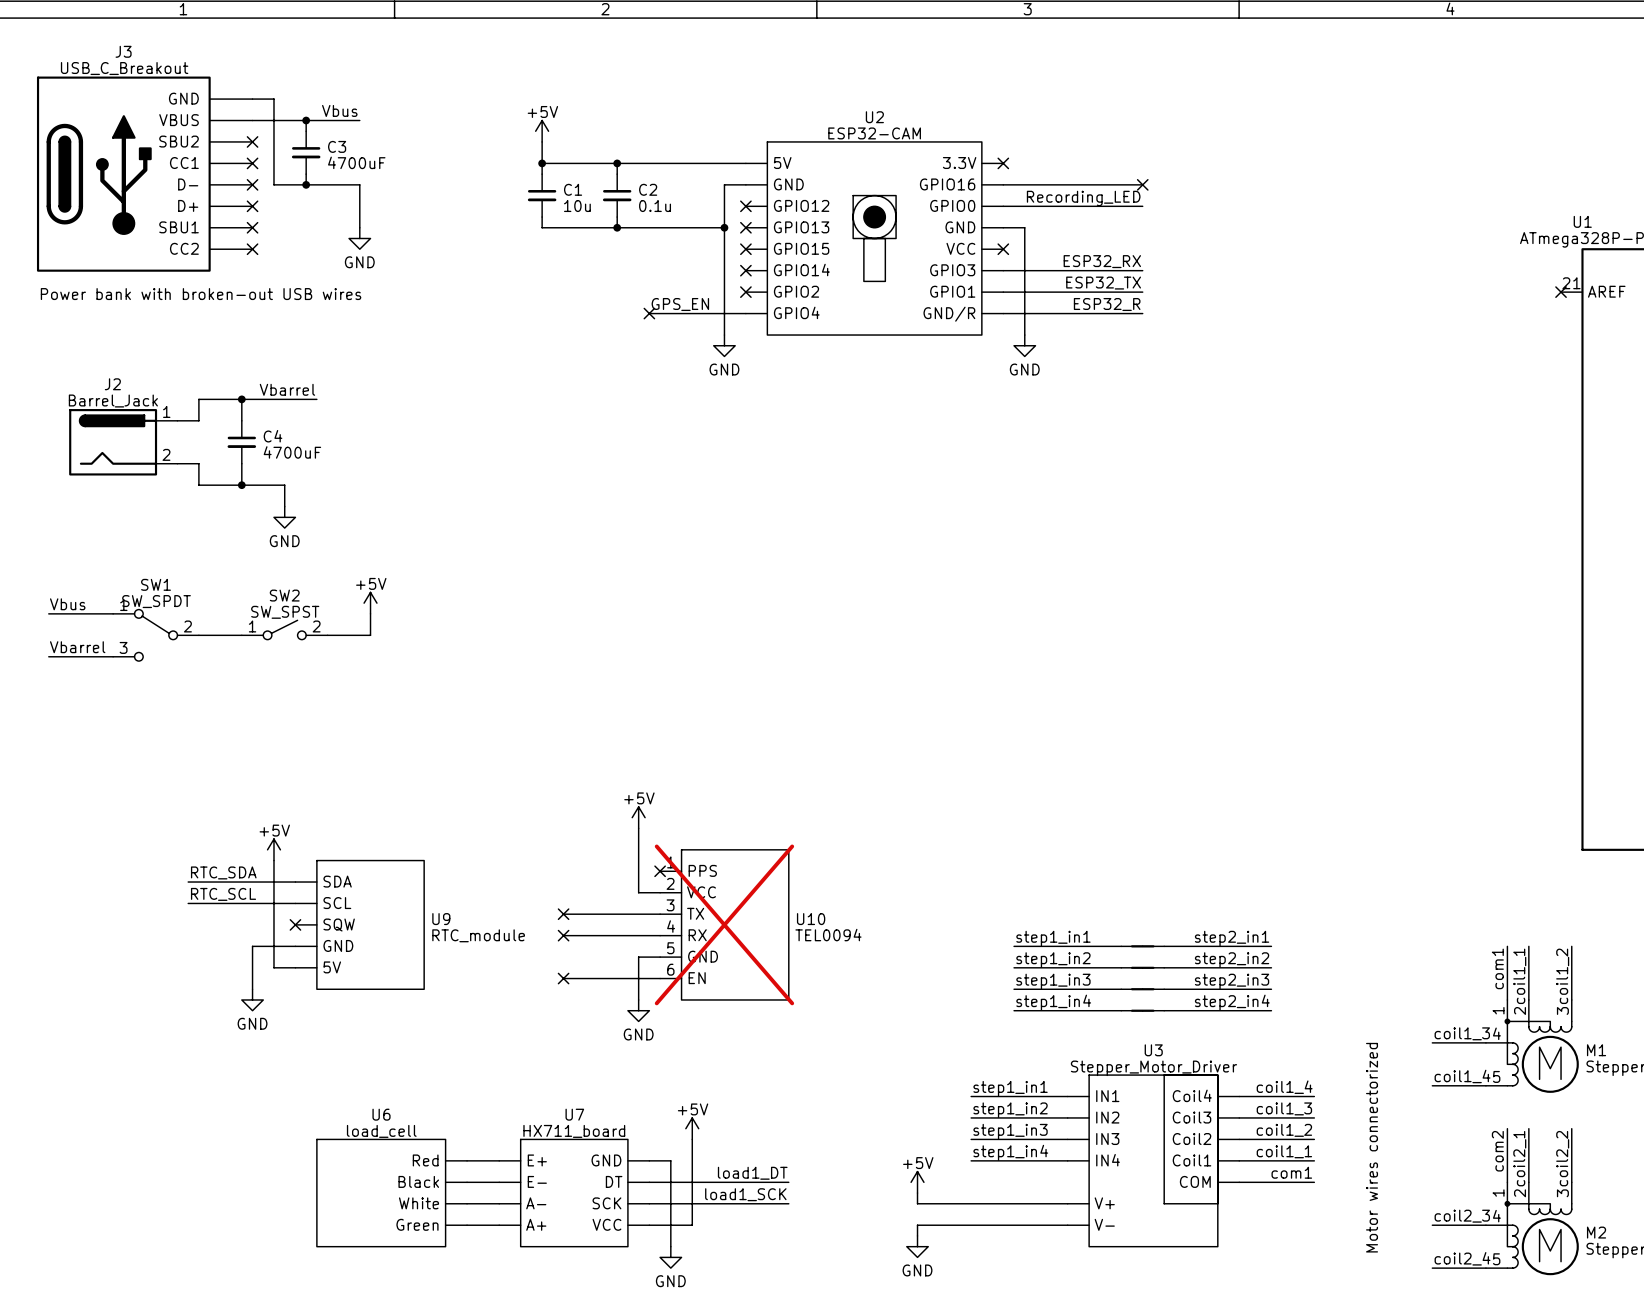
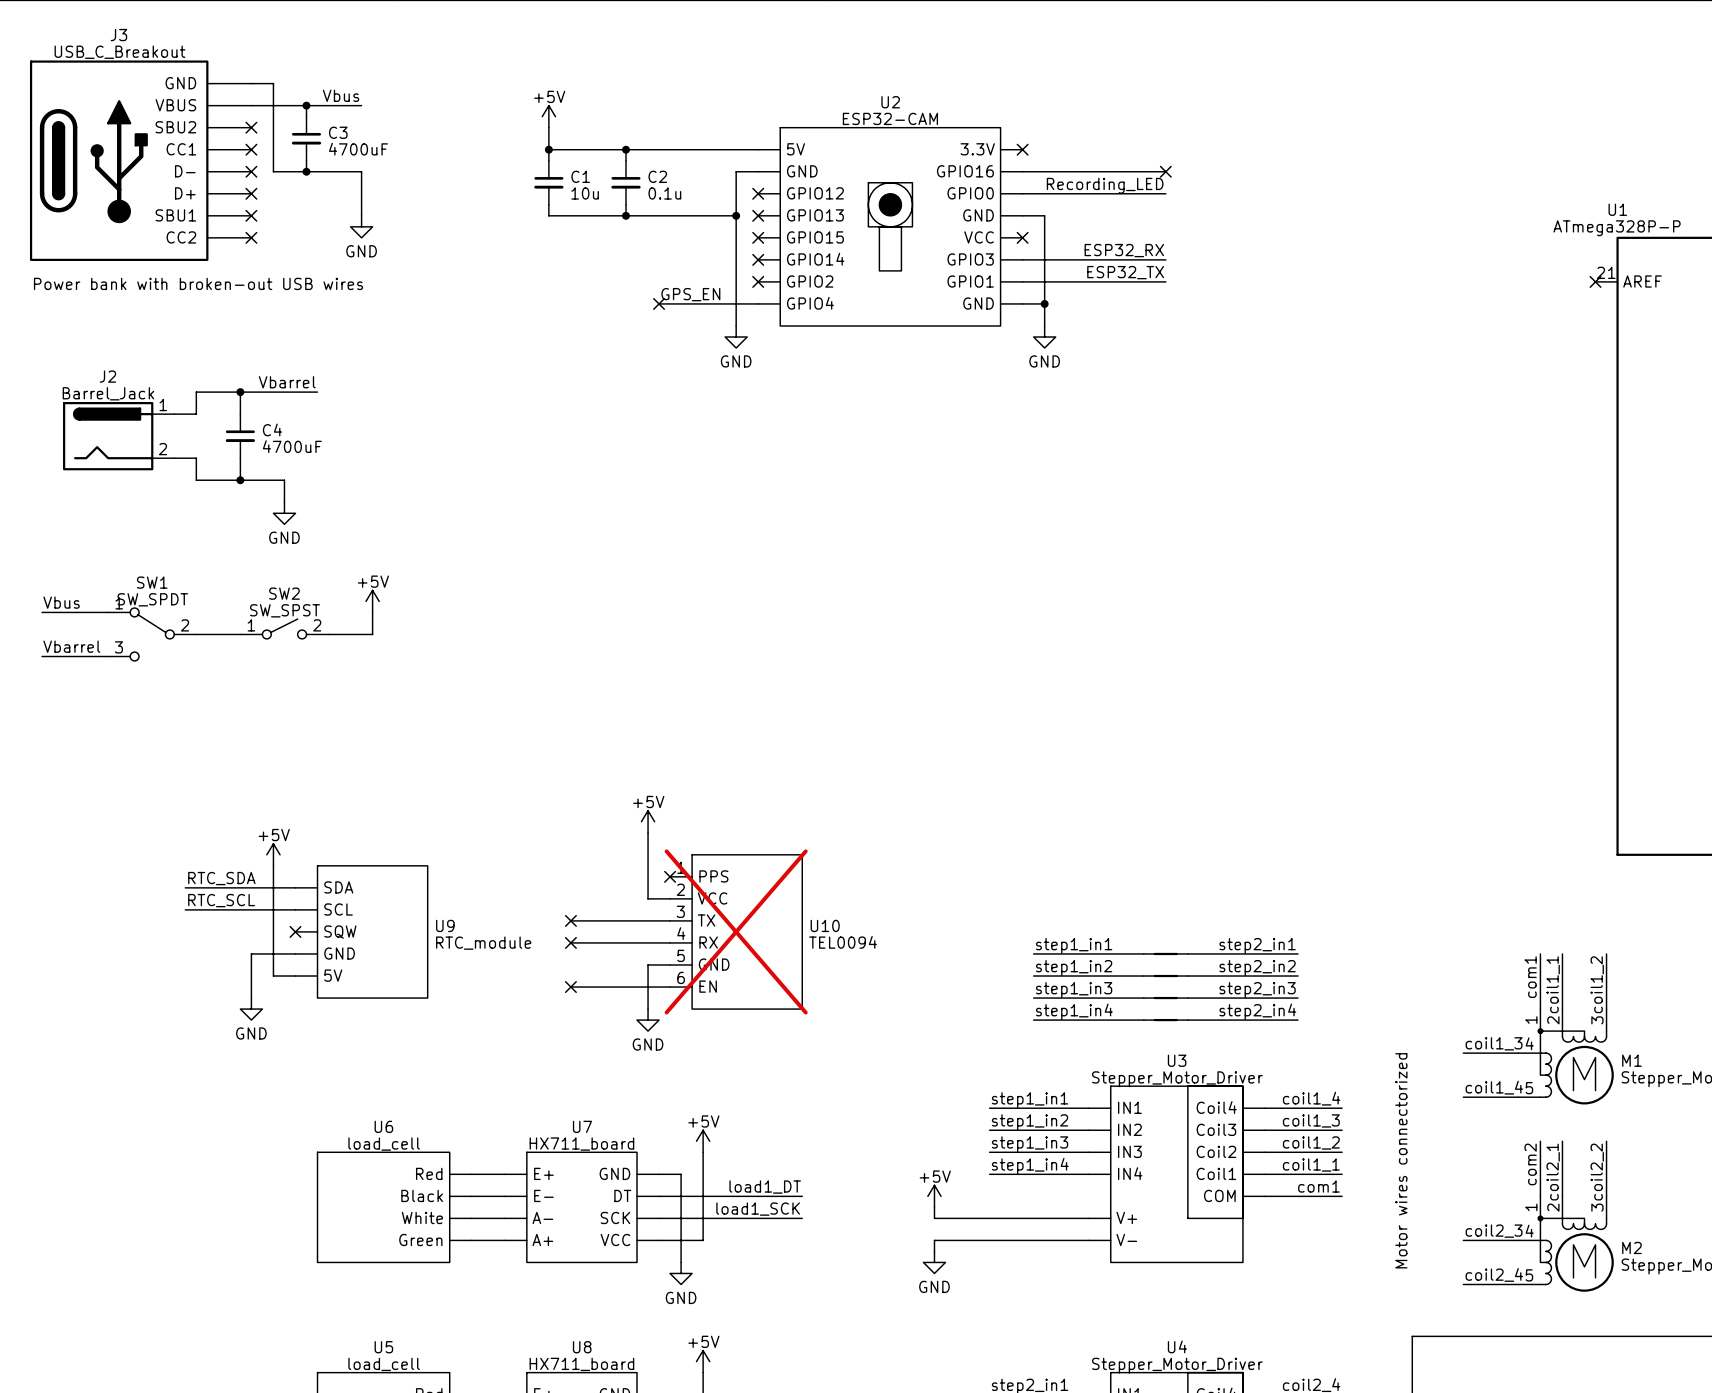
label: ESP32_R (1107, 304) -> none
wire: (1024, 313) (1142, 313) -> none
junction: none -> (1044, 303)
U2 pin name: GND/R (949, 314) -> GND (978, 303)

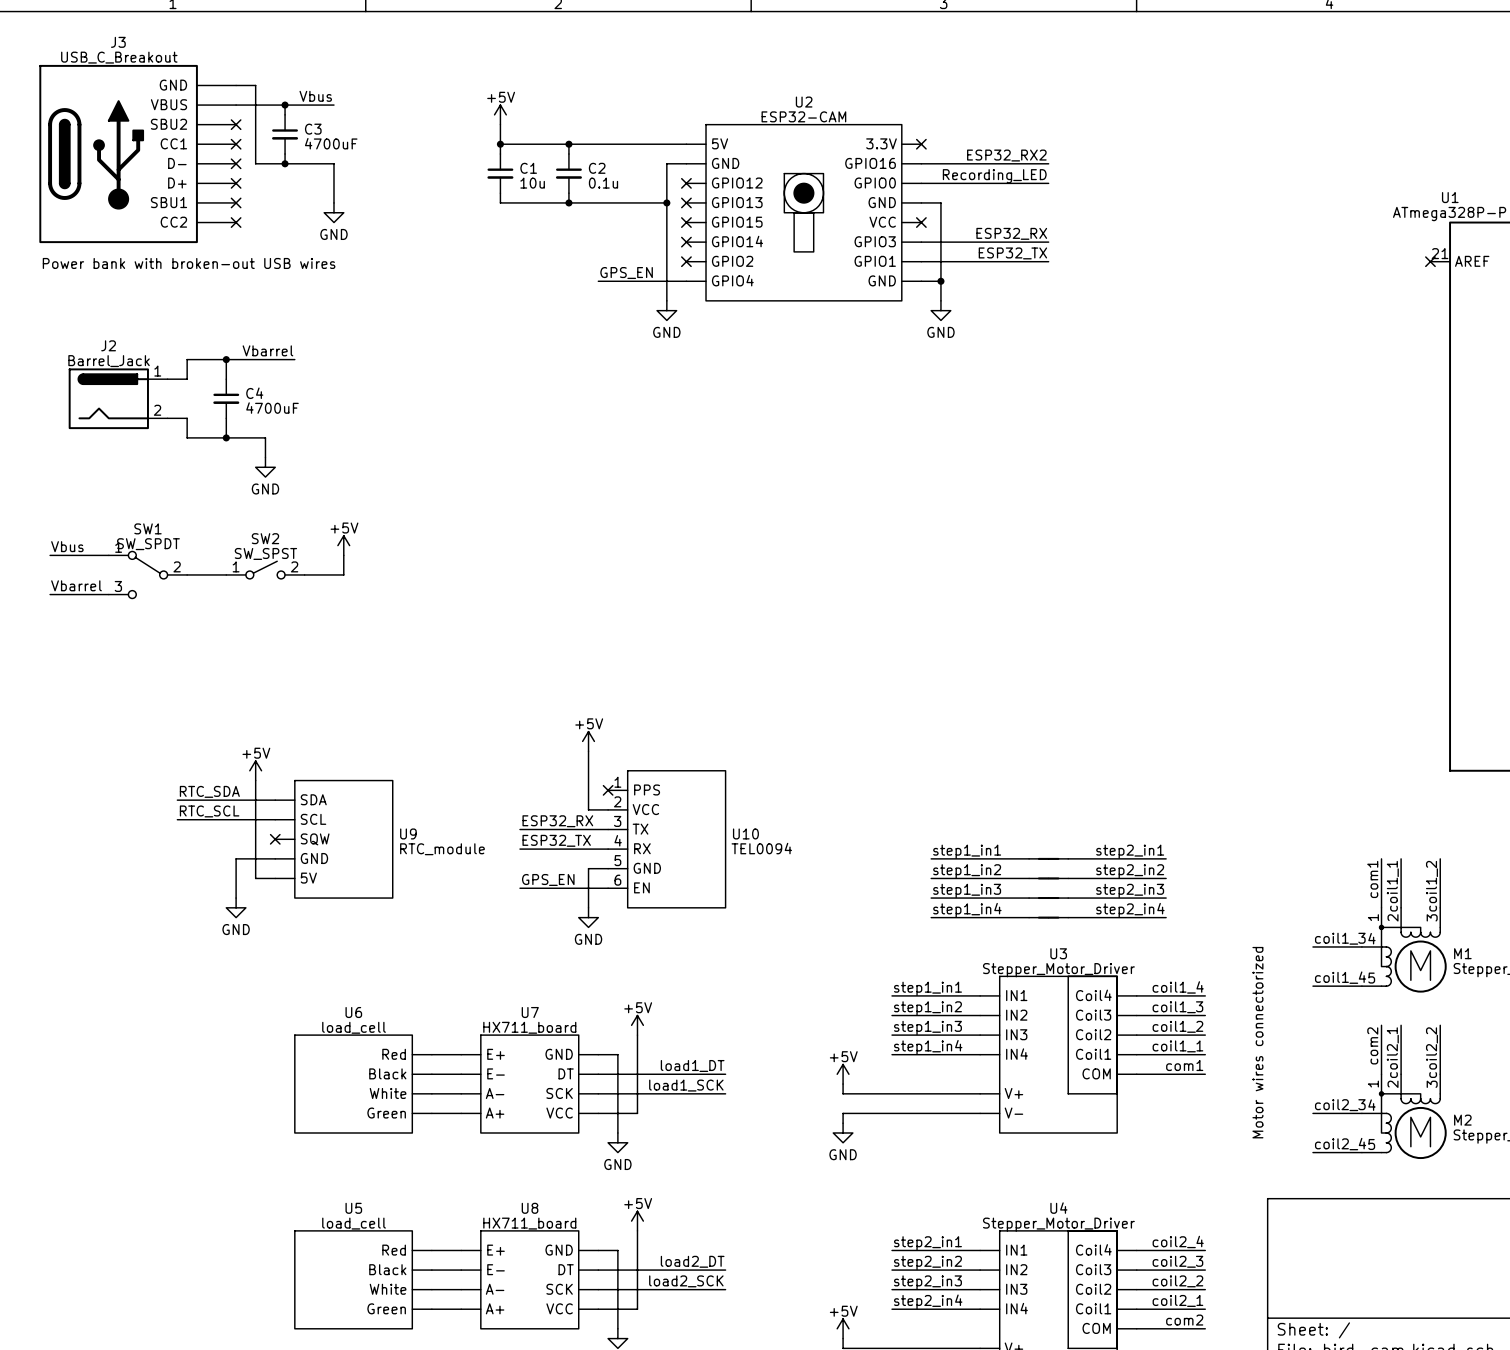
label: none -> ESP32_RX2 (1006, 155)
no-connect mark: (1165, 171) -> none
no-connect mark: (659, 303) -> none
label: none -> ESP32_RX (557, 821)
no-connect mark: (570, 920) -> none
U10 do-not-place cross: (736, 931) -> none
label: none -> ESP32_TX (556, 840)
no-connect mark: (570, 942) -> none
label: none -> GPS_EN (548, 879)
no-connect mark: (570, 987) -> none

